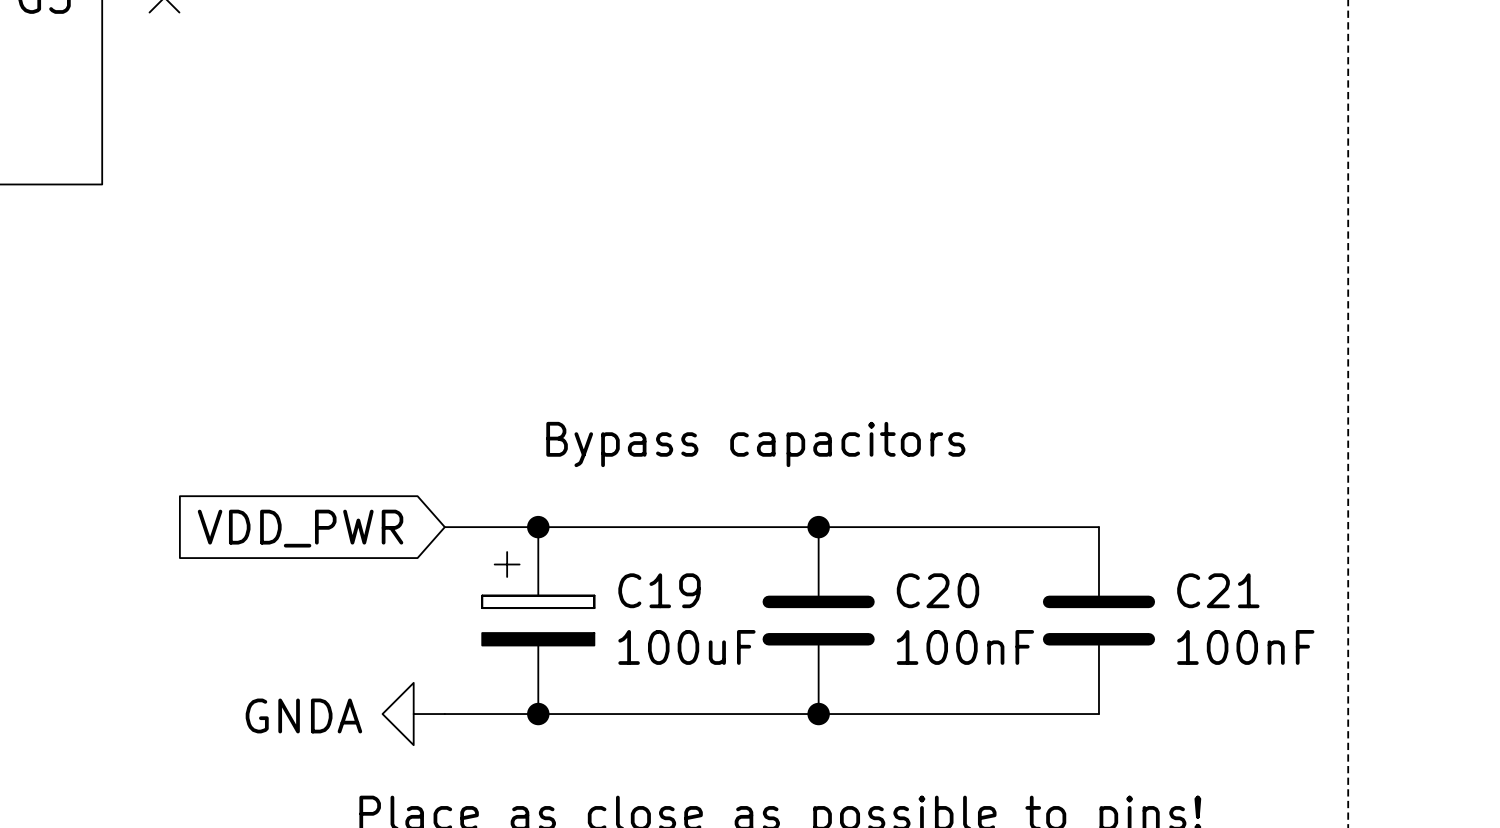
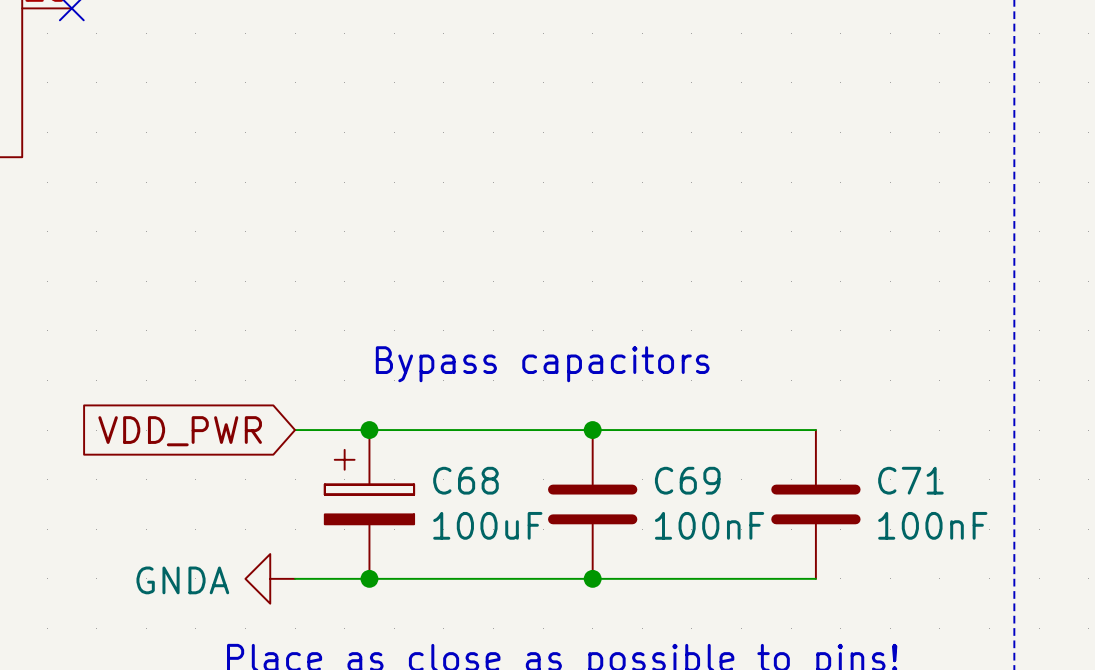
C19 name: C19 (659, 590) -> C68 (465, 480)
C20 name: C20 (937, 590) -> C69 (687, 480)
C21 name: C21 (1218, 590) -> C71 (910, 480)

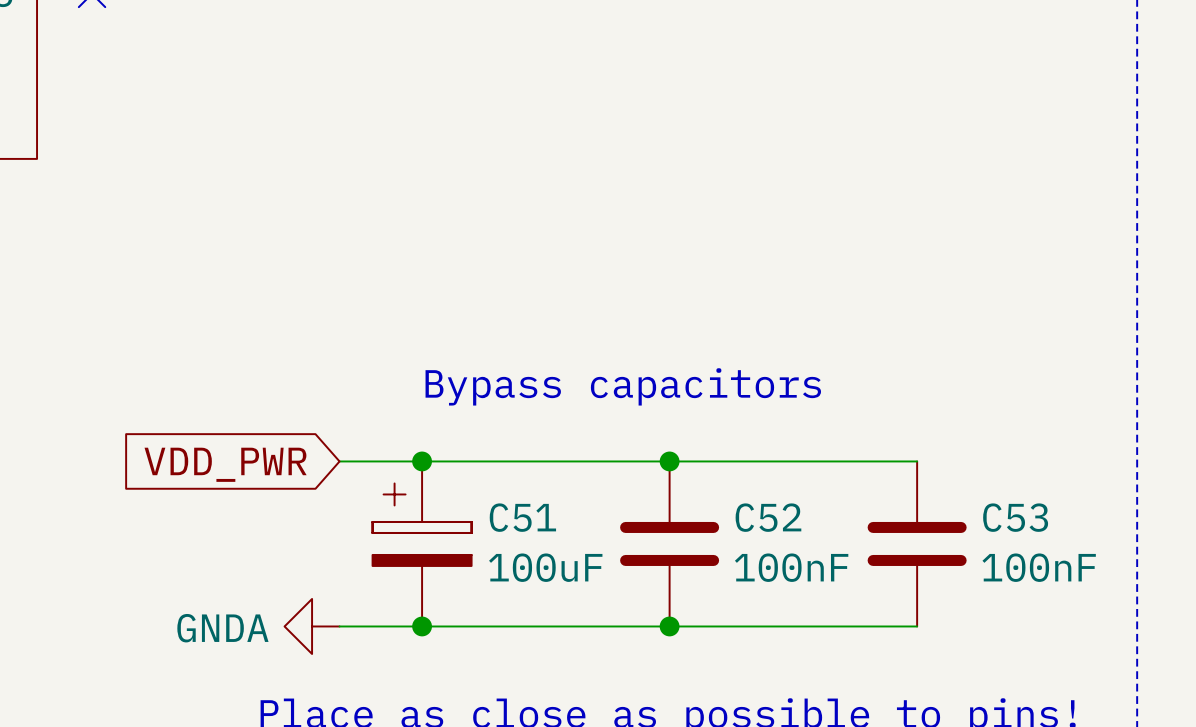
C68 name: C68 (465, 480) -> C51 (522, 517)
C69 name: C69 (687, 480) -> C52 (768, 517)
C71 name: C71 (910, 480) -> C53 (1015, 517)

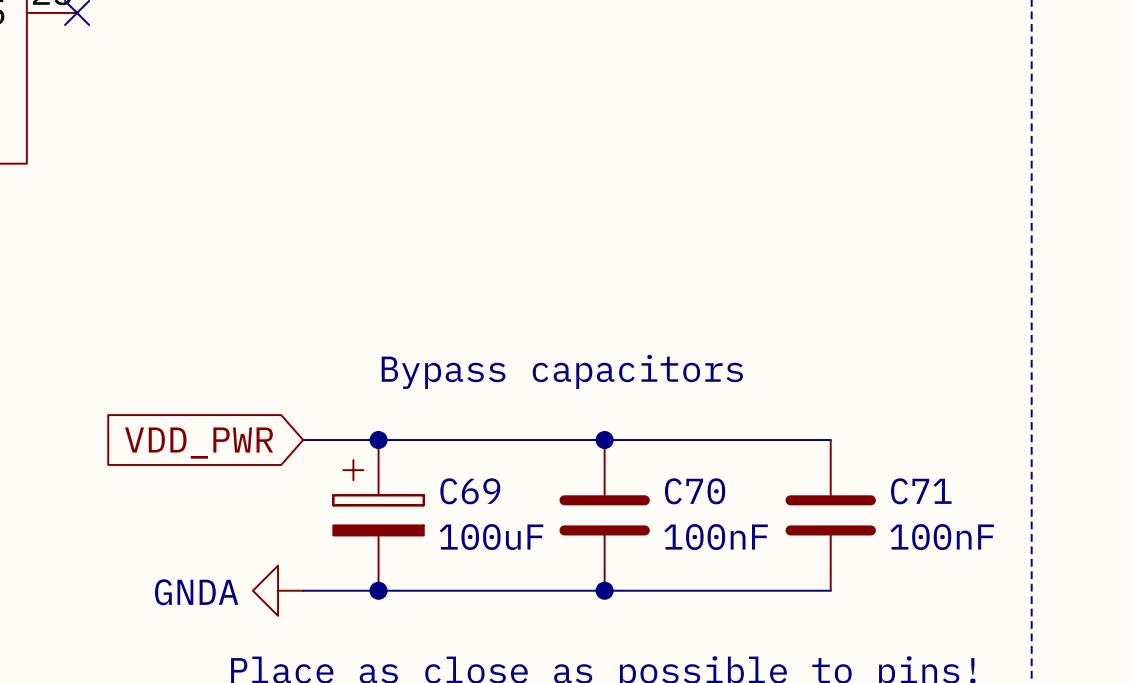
C51 name: C51 (522, 517) -> C69 (470, 491)
C52 name: C52 (768, 517) -> C70 (695, 491)
C53 name: C53 (1015, 517) -> C71 (921, 491)

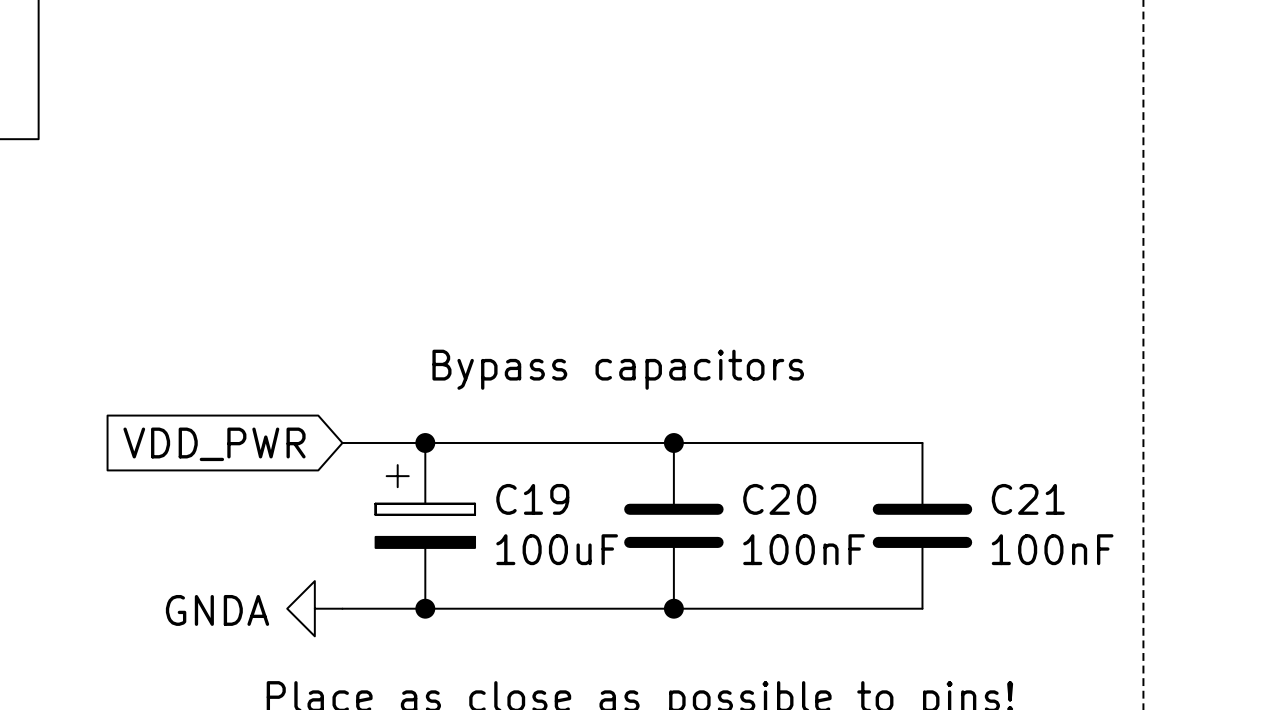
C69 name: C69 (470, 491) -> C19 (532, 499)
C70 name: C70 (695, 491) -> C20 (779, 499)
C71 name: C71 (921, 491) -> C21 (1028, 499)

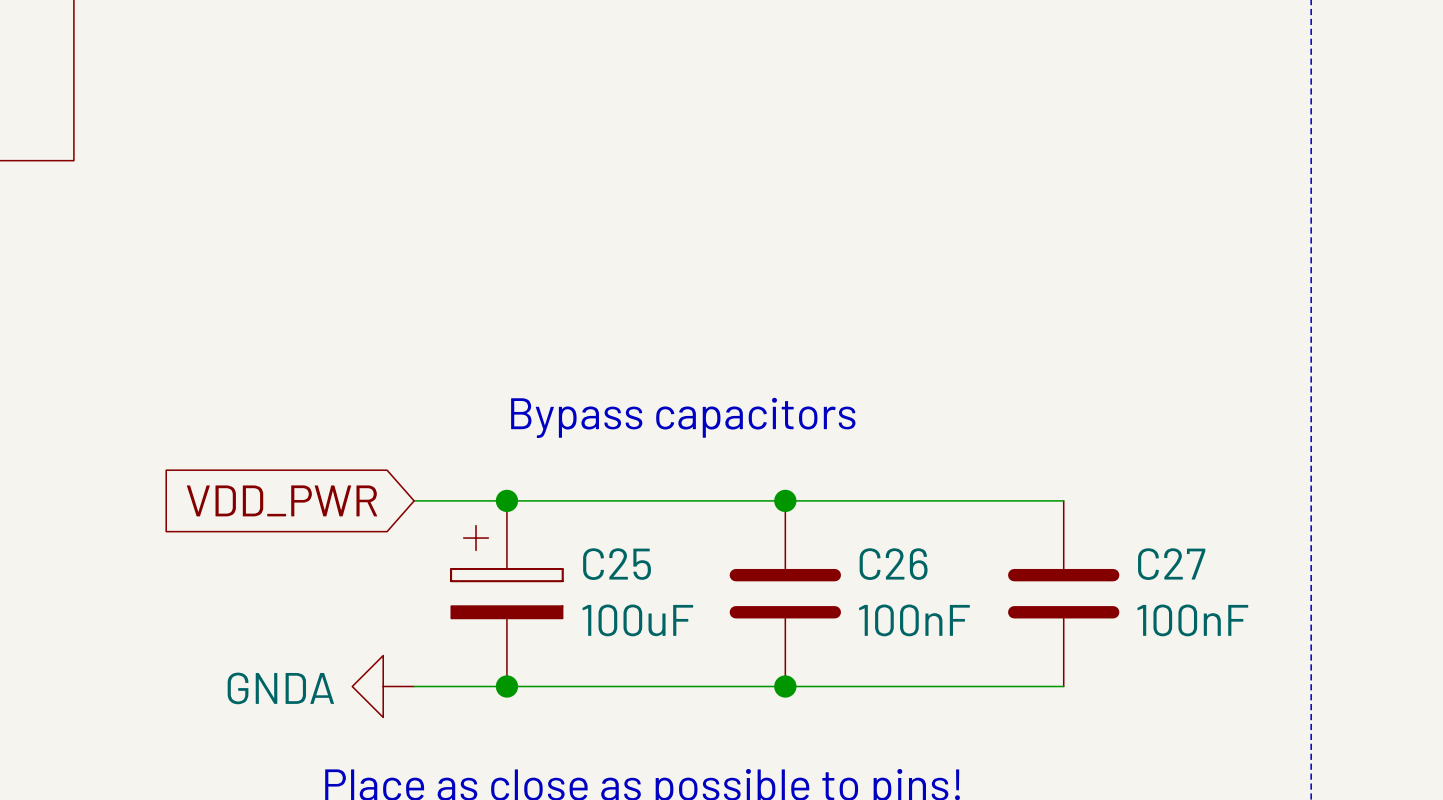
C19 name: C19 (532, 499) -> C25 (617, 564)
C20 name: C20 (779, 499) -> C26 (893, 564)
C21 name: C21 (1028, 499) -> C27 (1171, 564)

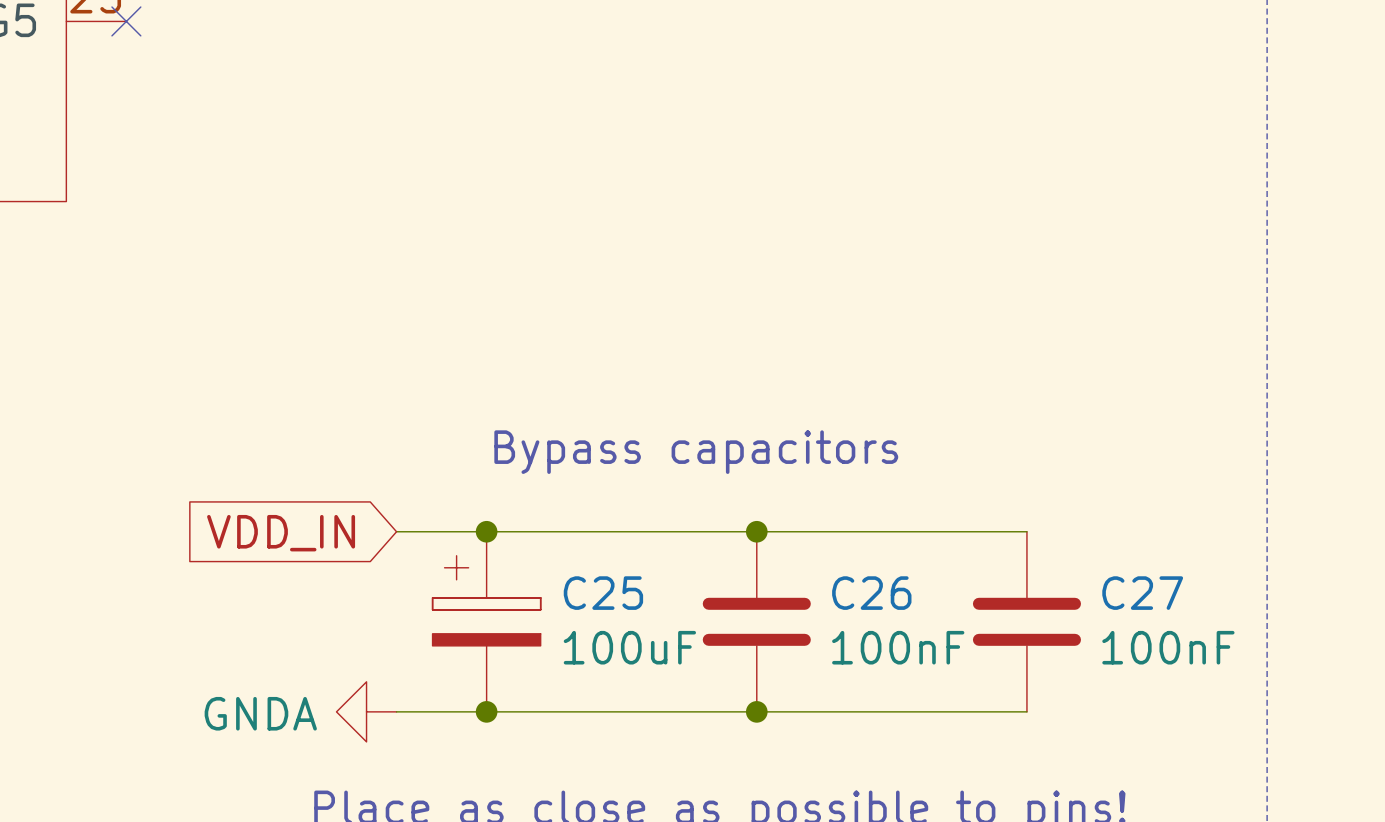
global label: VDD_PWR (282, 500) -> VDD_IN (281, 533)

